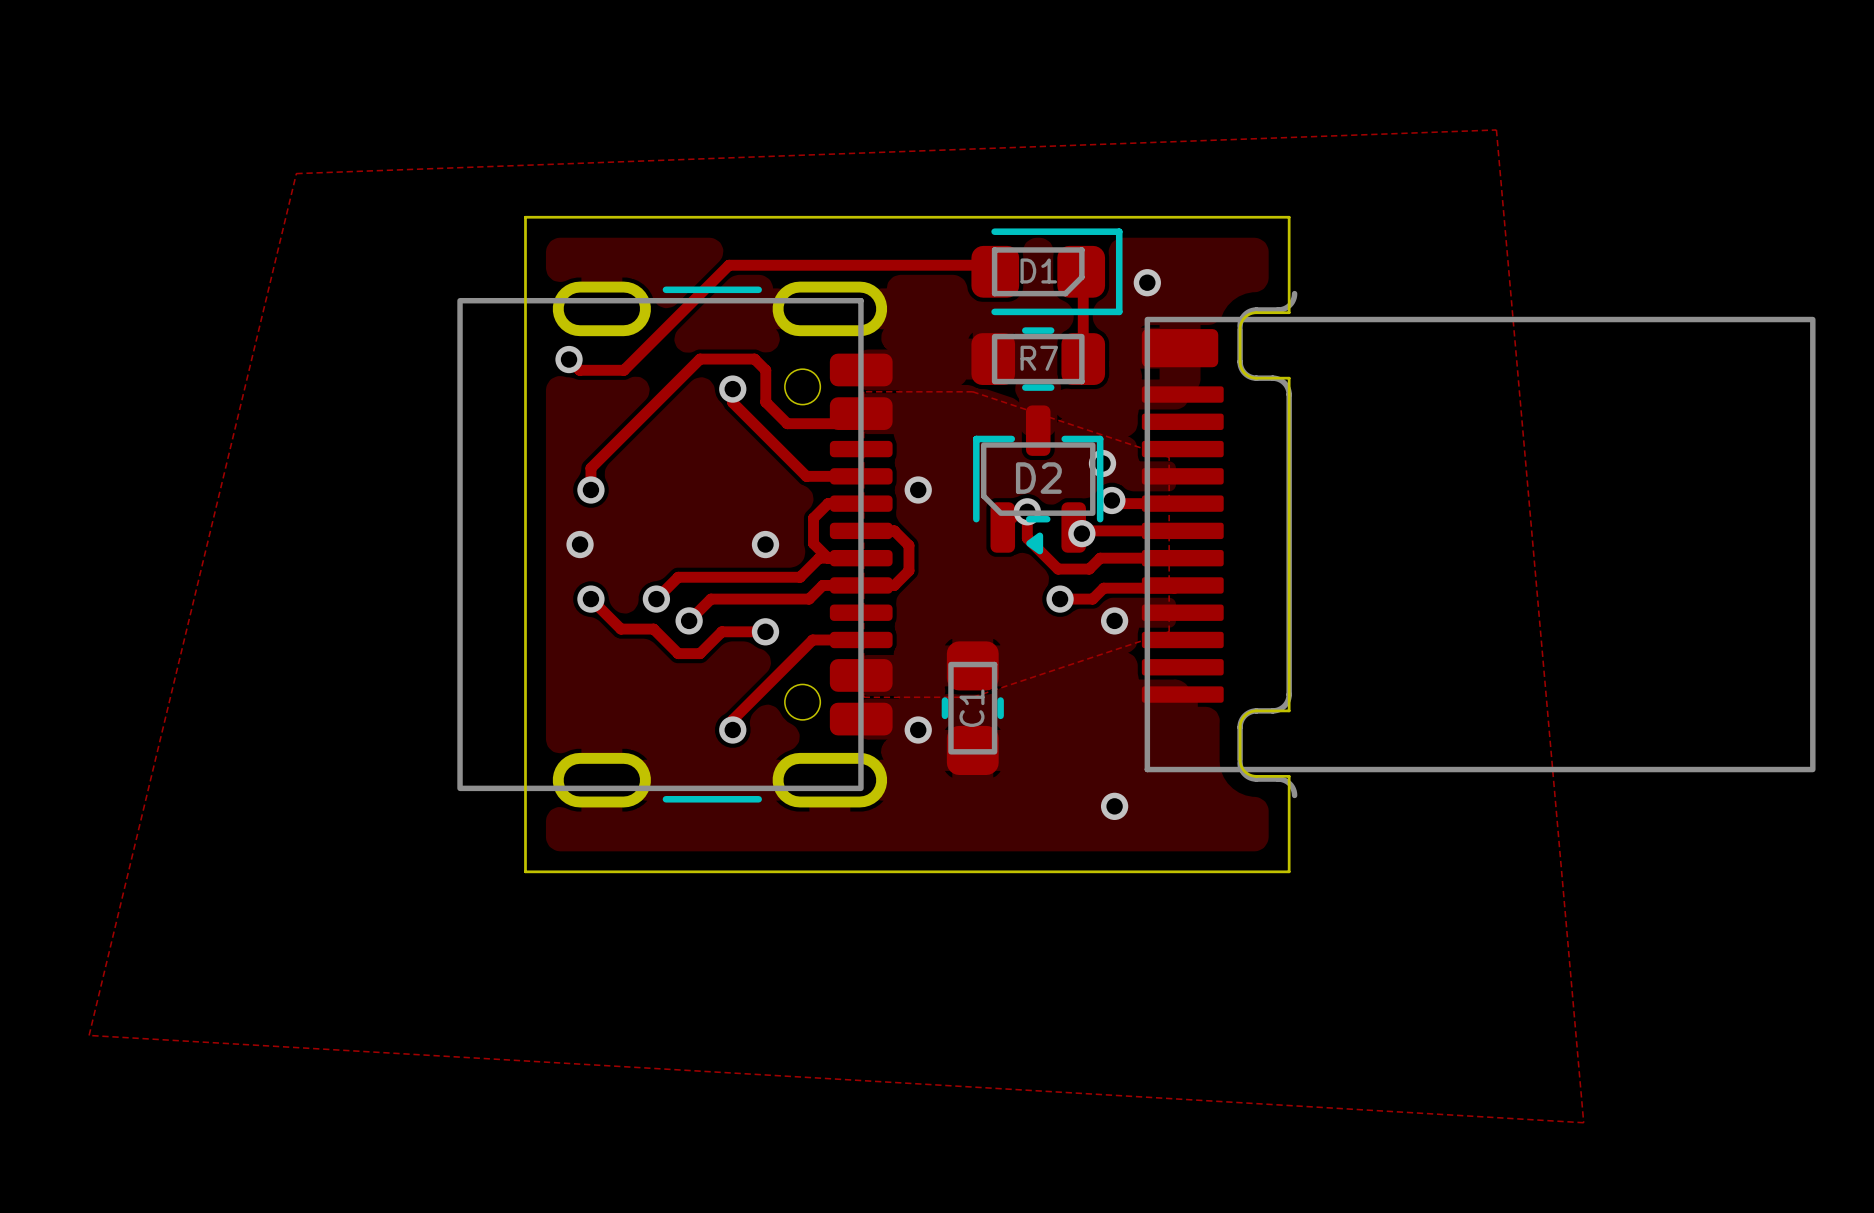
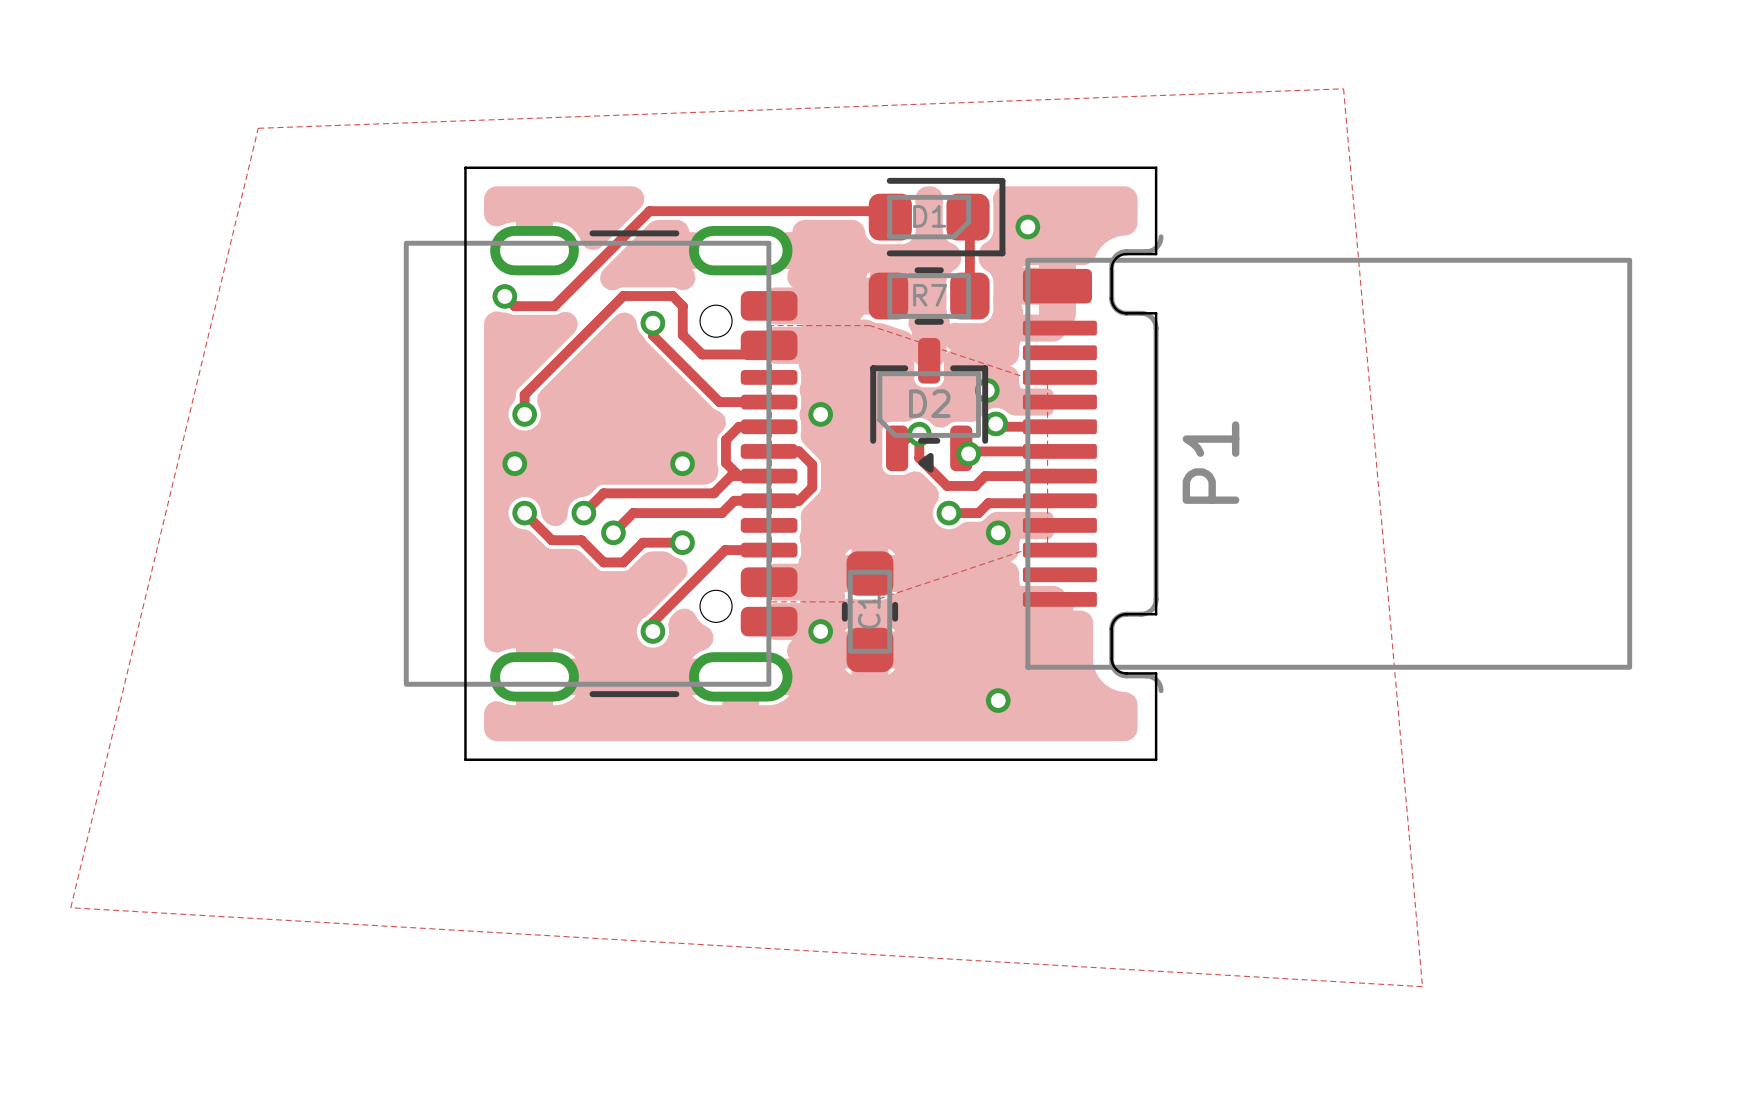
P1 name: none -> P1 (1211, 462)

